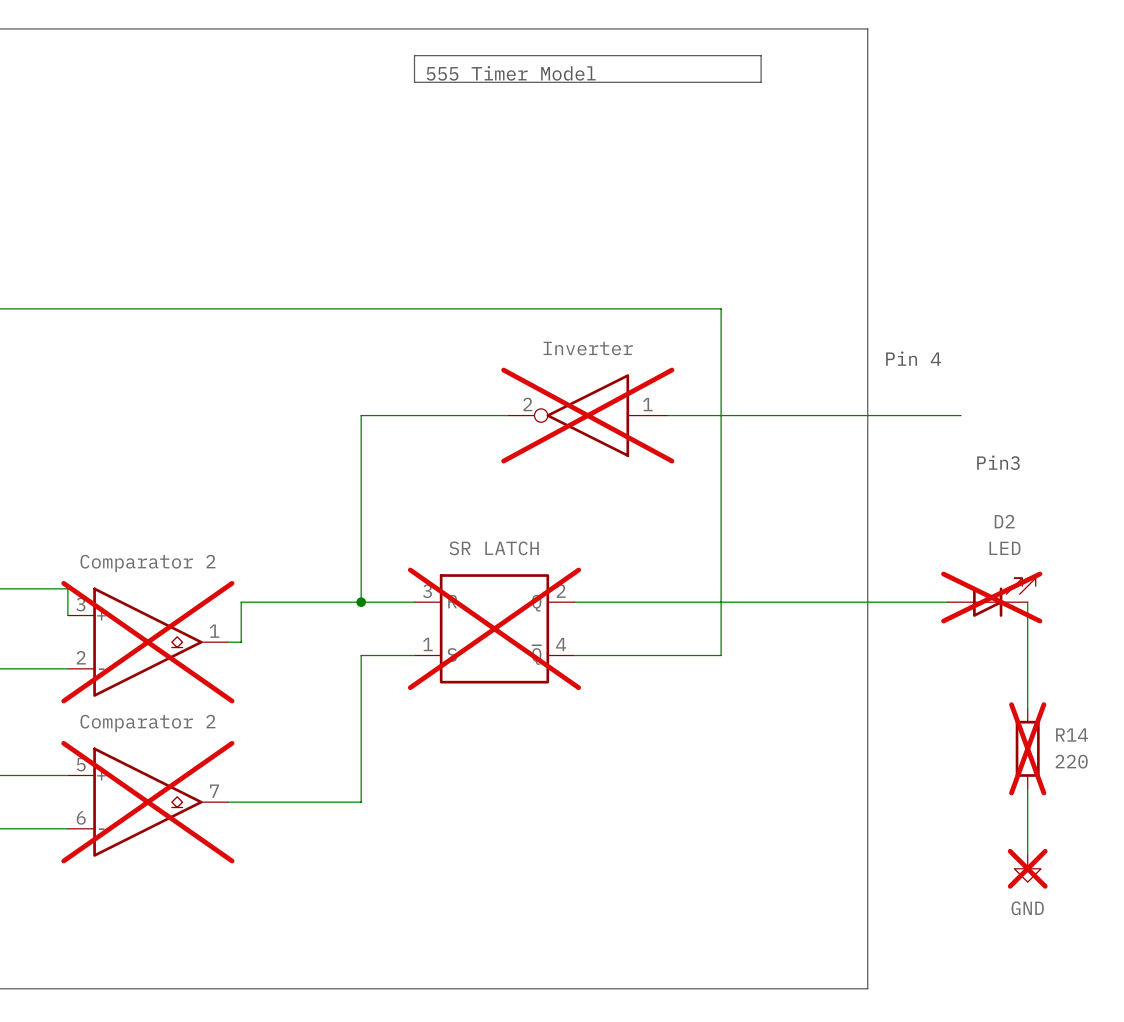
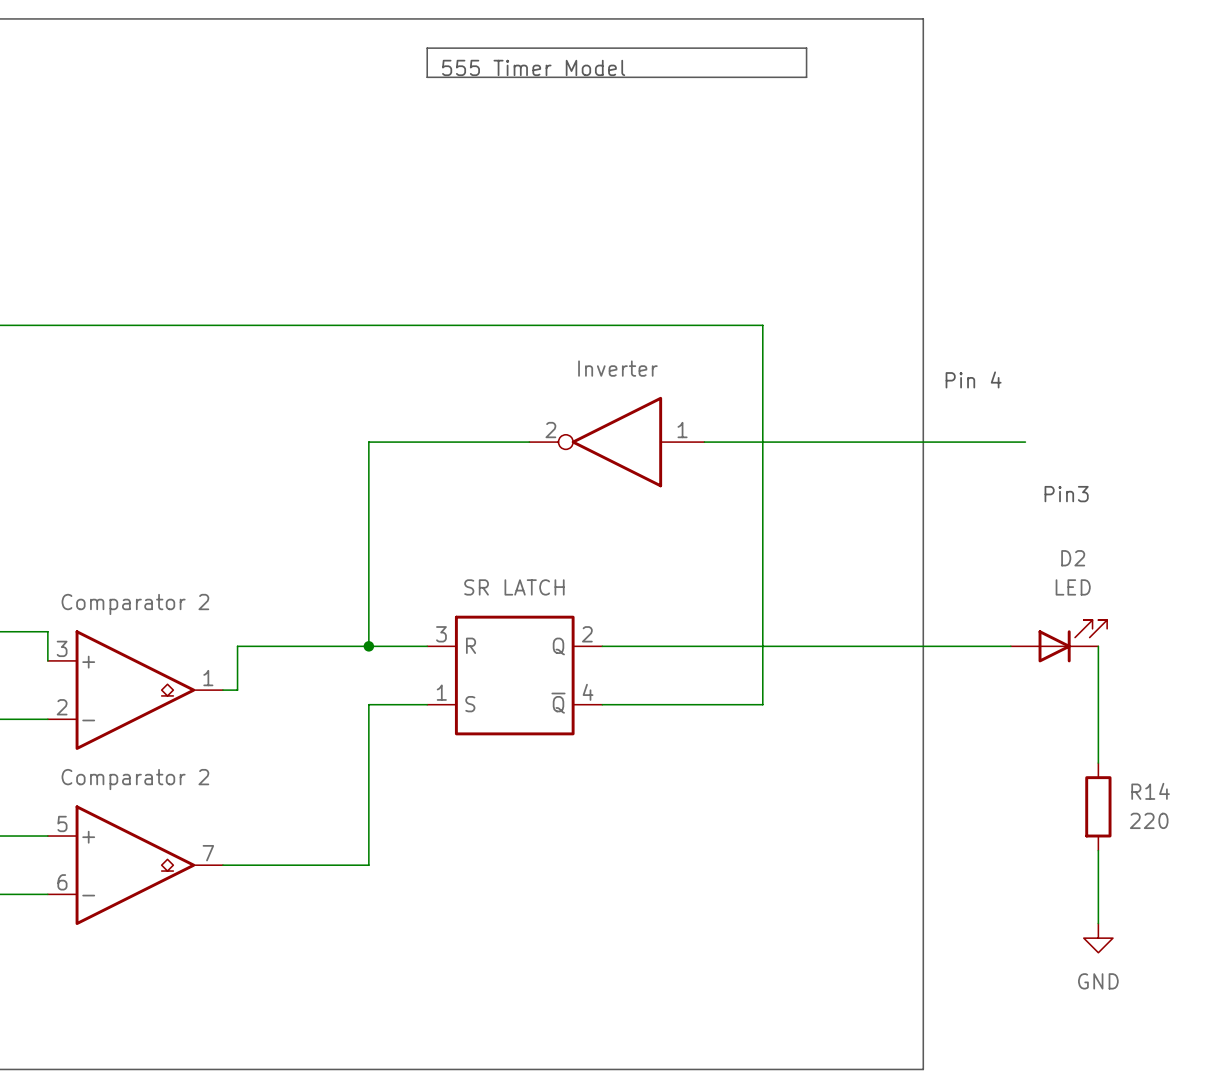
part do-not-place cross: (587, 415) -> none
D2 do-not-place cross: (991, 597) -> none
part do-not-place cross: (494, 628) -> none
part do-not-place cross: (147, 642) -> none
R14 do-not-place cross: (1027, 748) -> none
part do-not-place cross: (147, 802) -> none
power symbol do-not-place cross: (1027, 868) -> none

